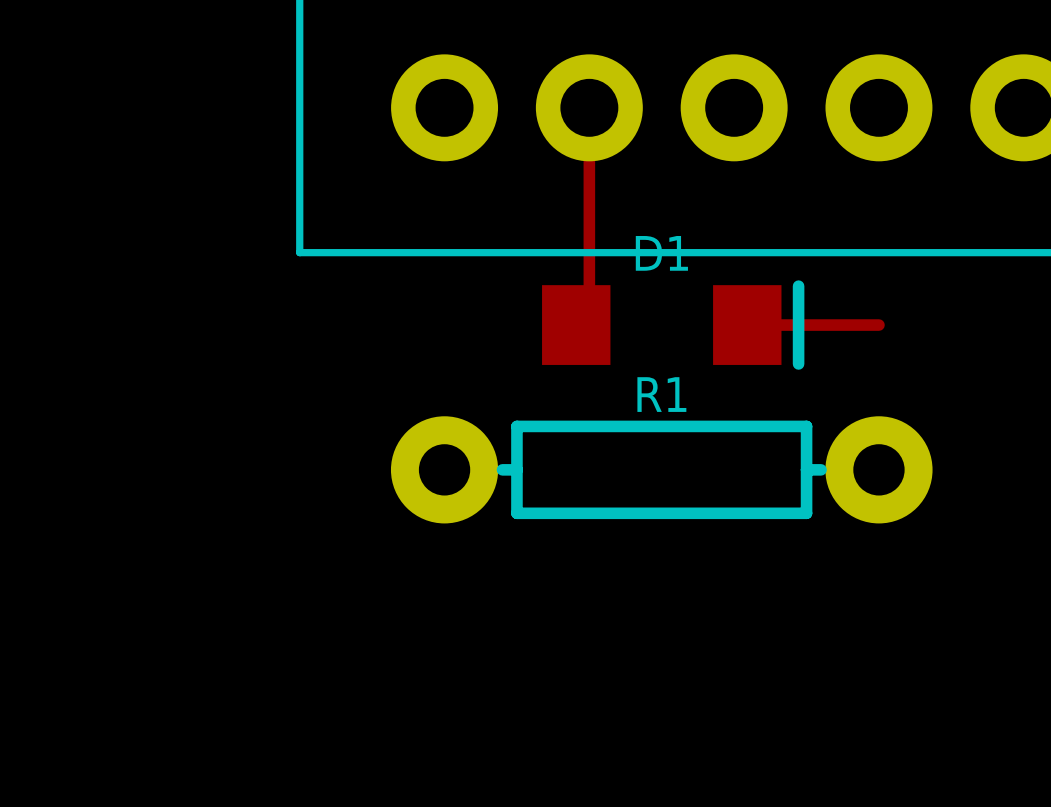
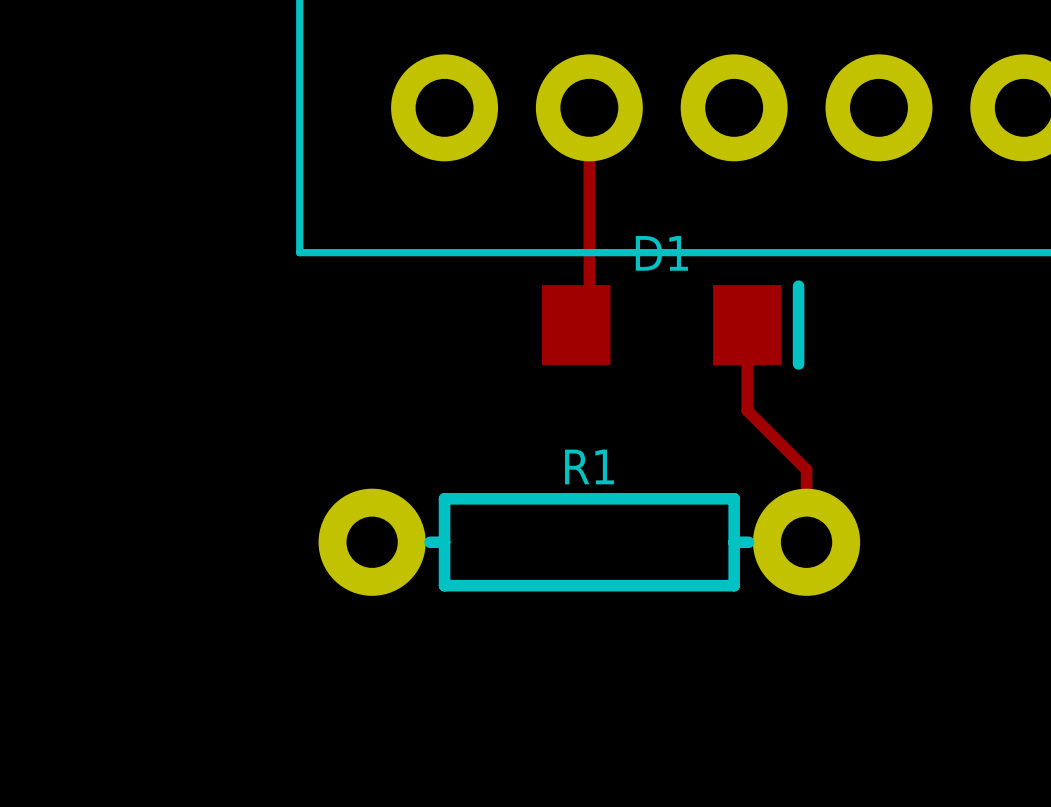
track: (747, 325) (878, 325) -> (747, 325) (747, 410) (806, 469) (806, 542)
R1 position: (661, 469) -> (589, 542)

